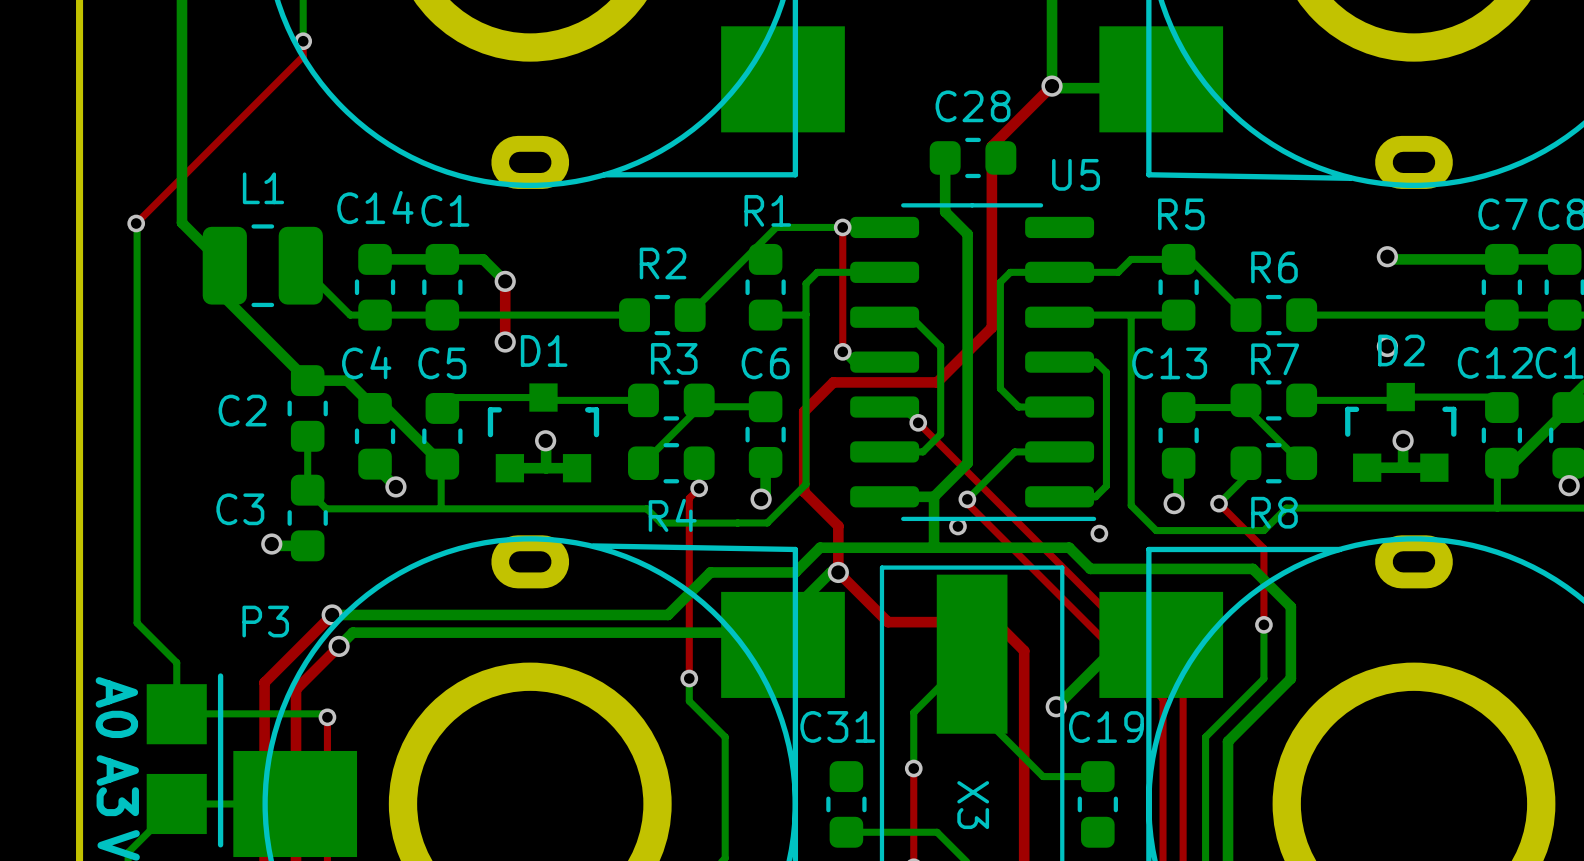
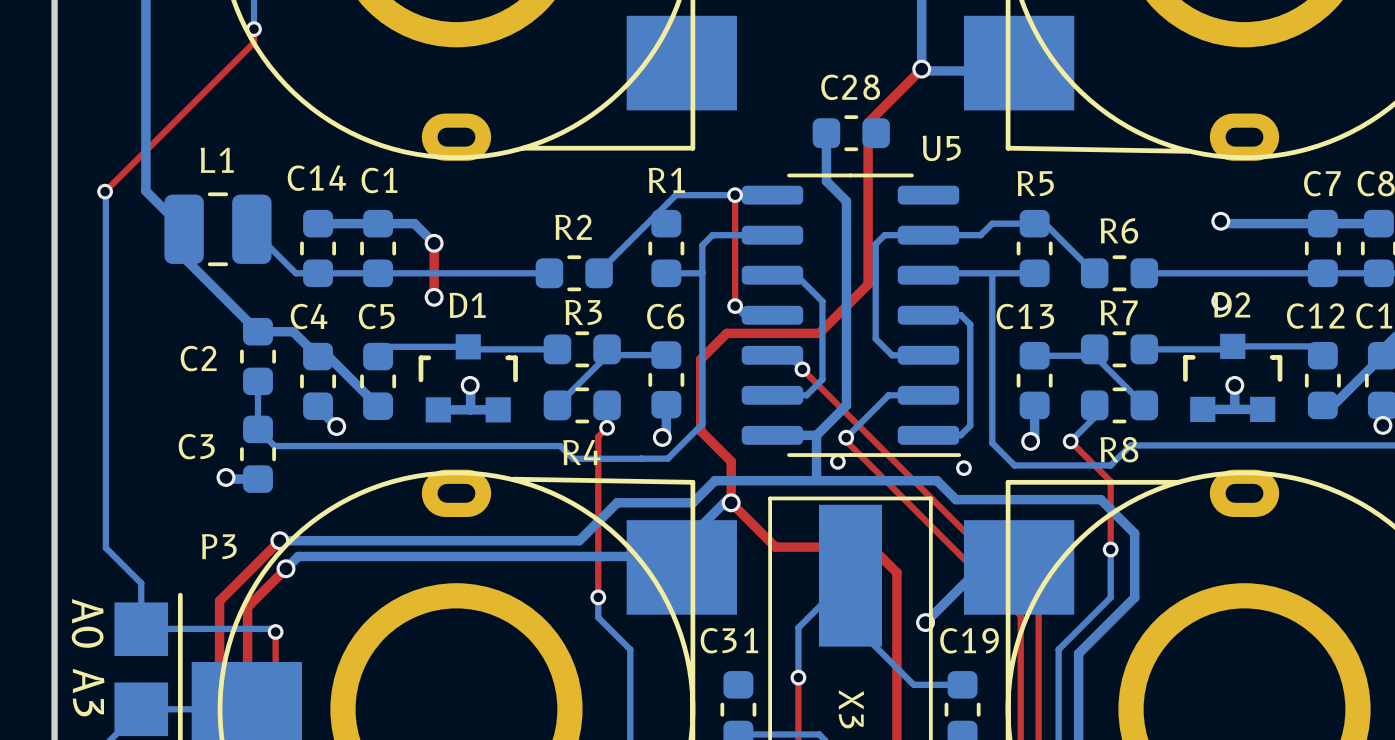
bottom track: (441, 465) (441, 508) -> none
bottom track: (1497, 467) (1497, 508) -> none

